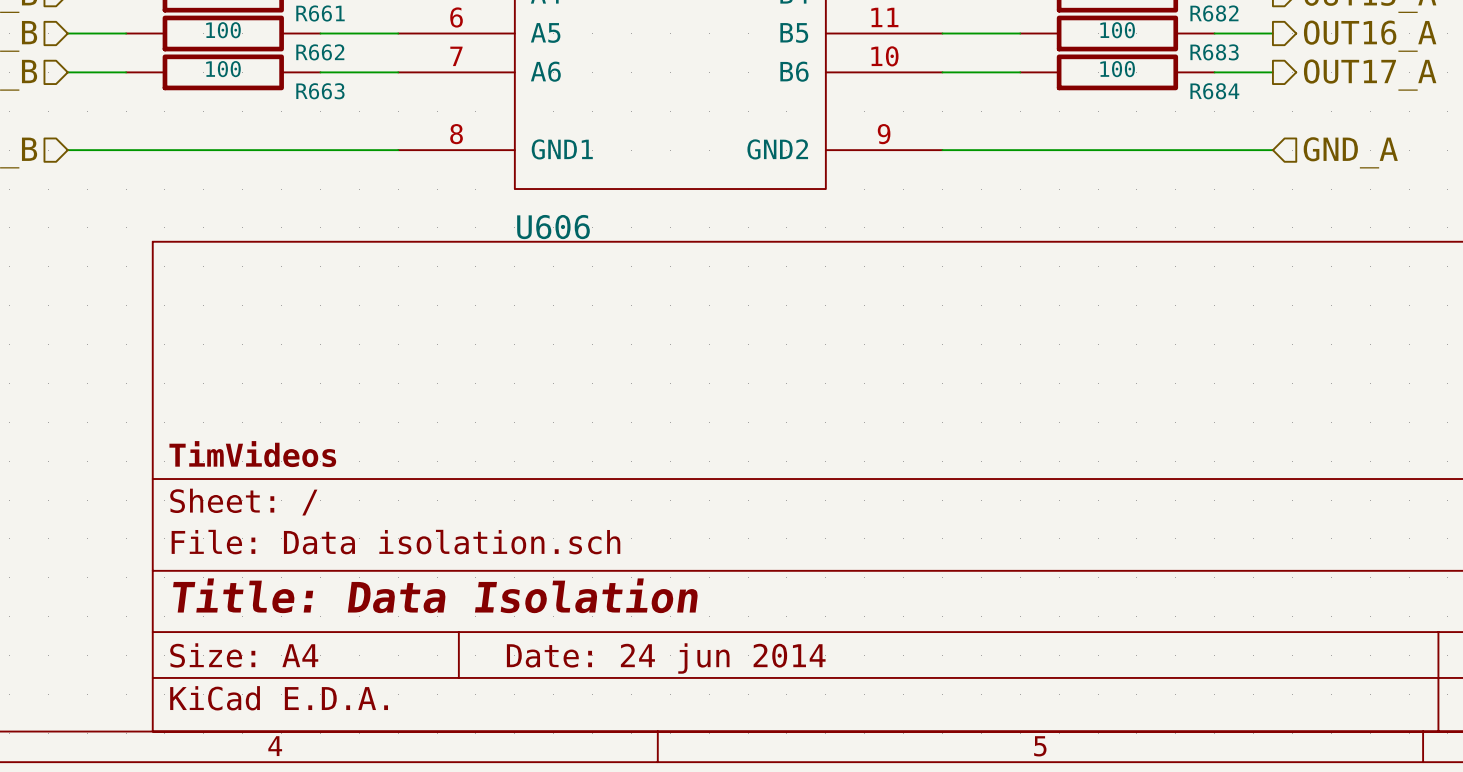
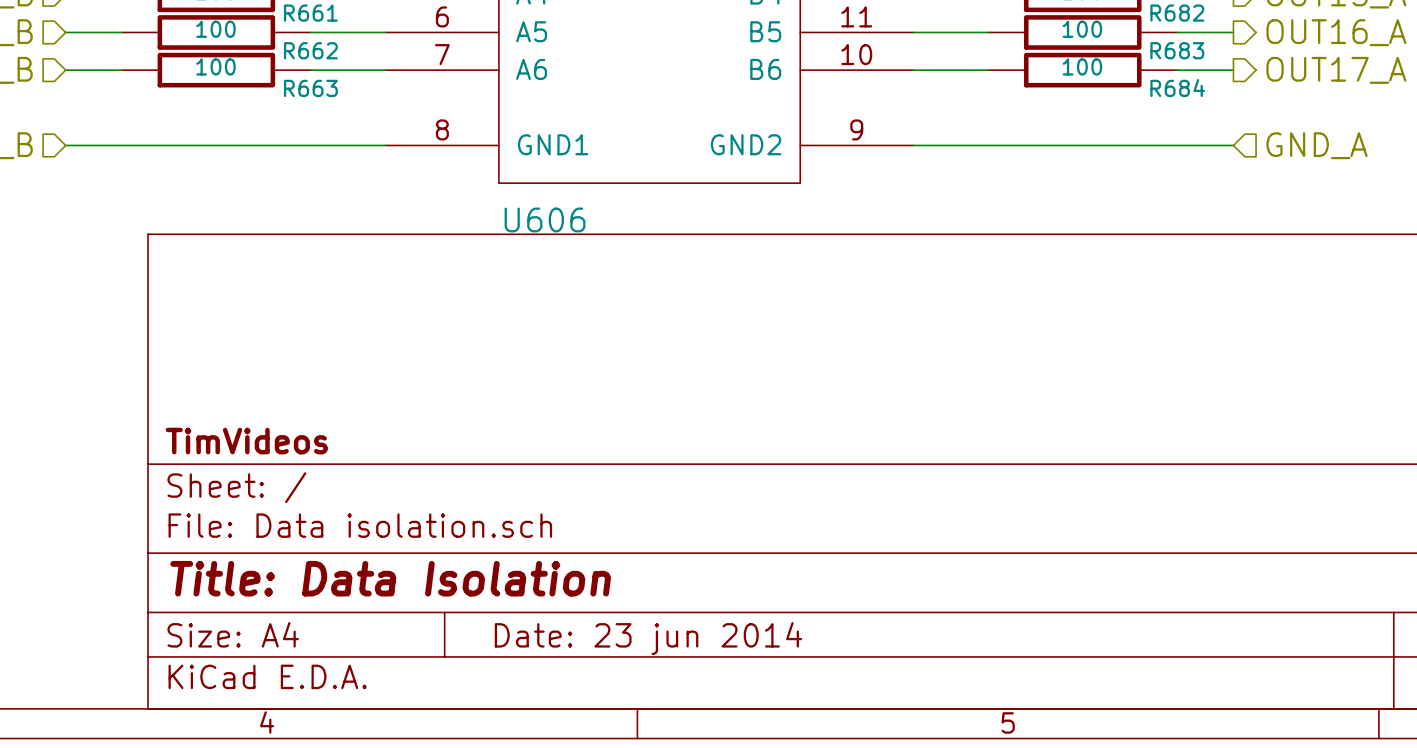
title block: Date: 24 jun 2014 (666, 658) -> Date: 23 jun 2014 (648, 638)

